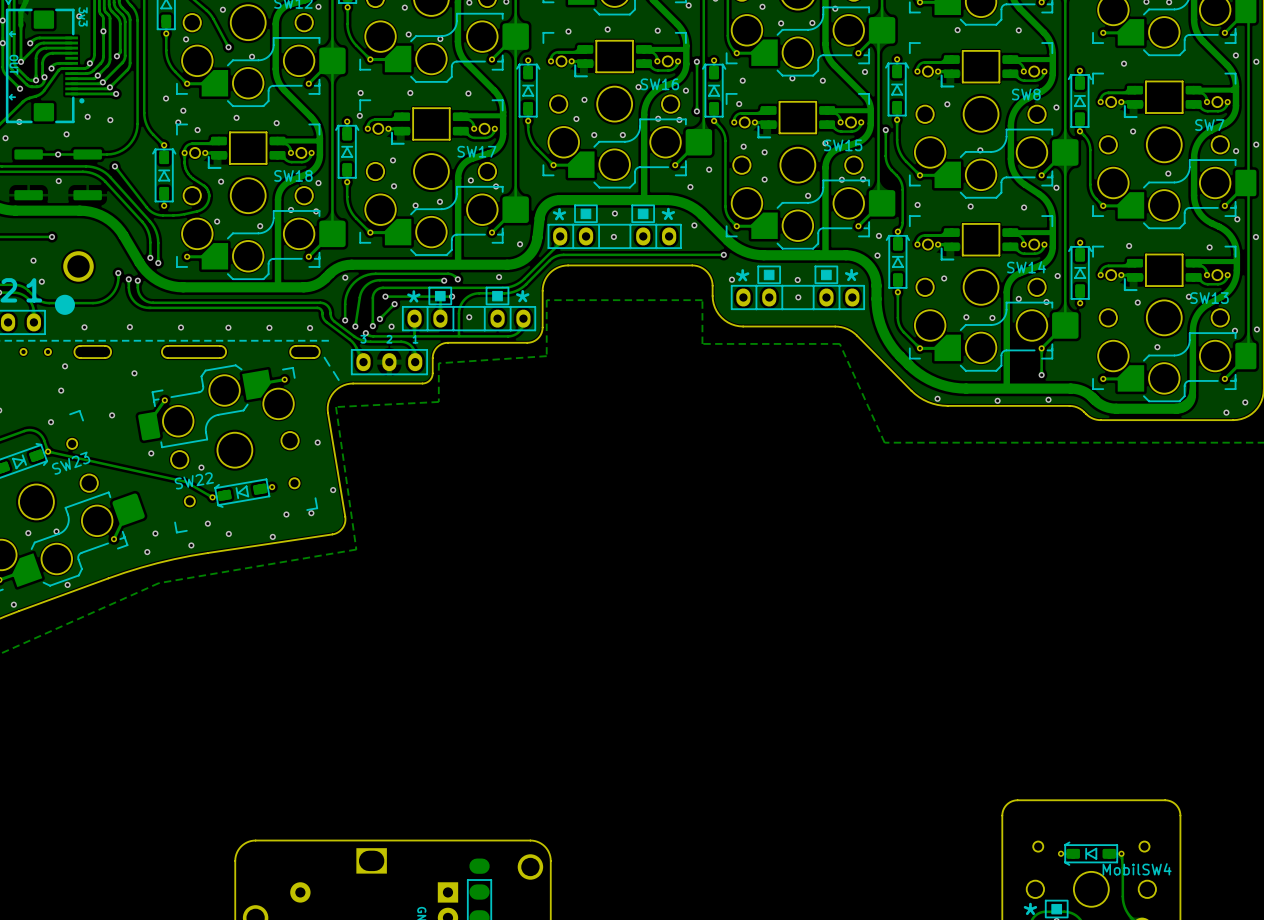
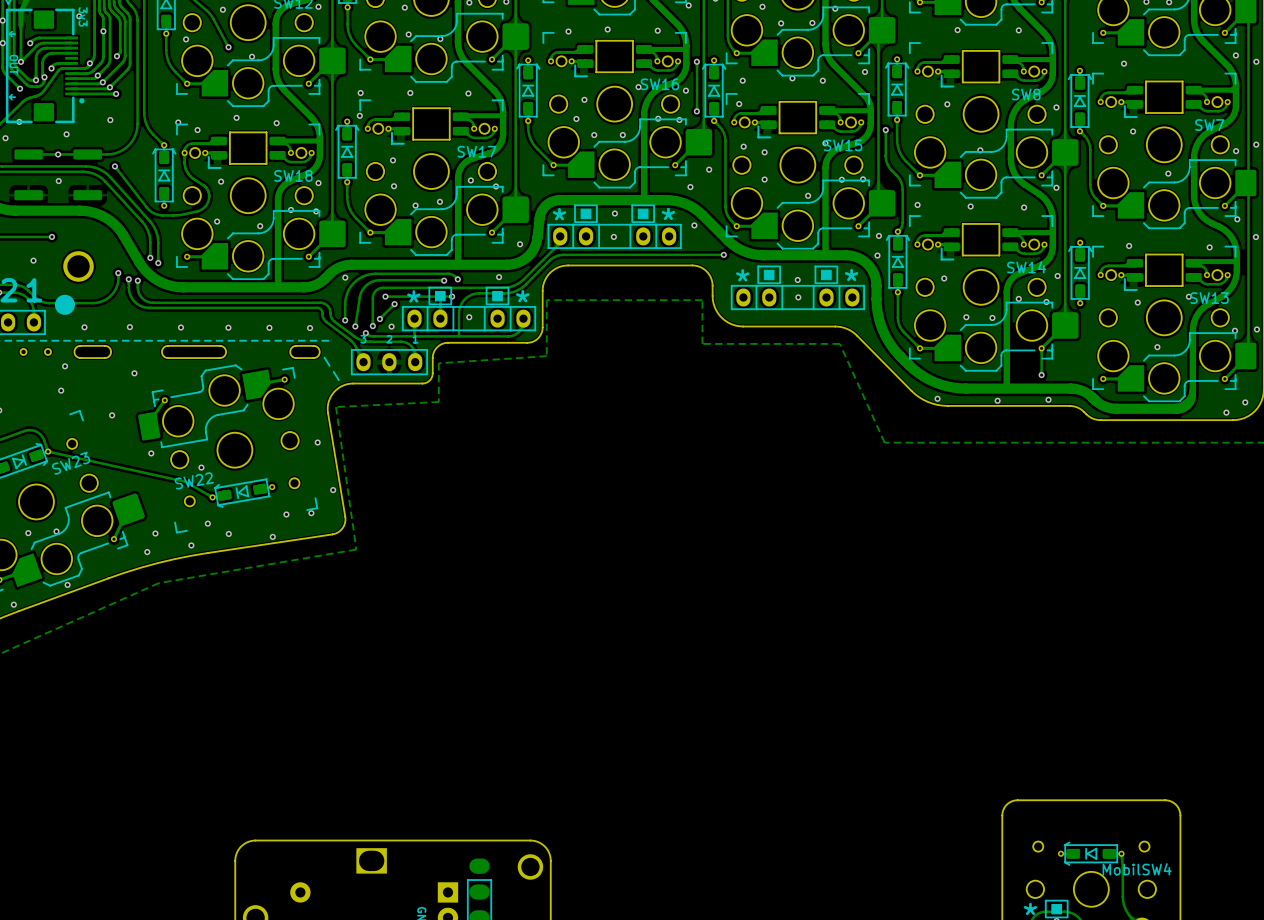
via: (166, 98) -> none
via: (183, 110) -> none
via: (87, 116) -> none
via: (731, 279) -> none
via: (41, 281) -> none
via: (51, 422) -> none

